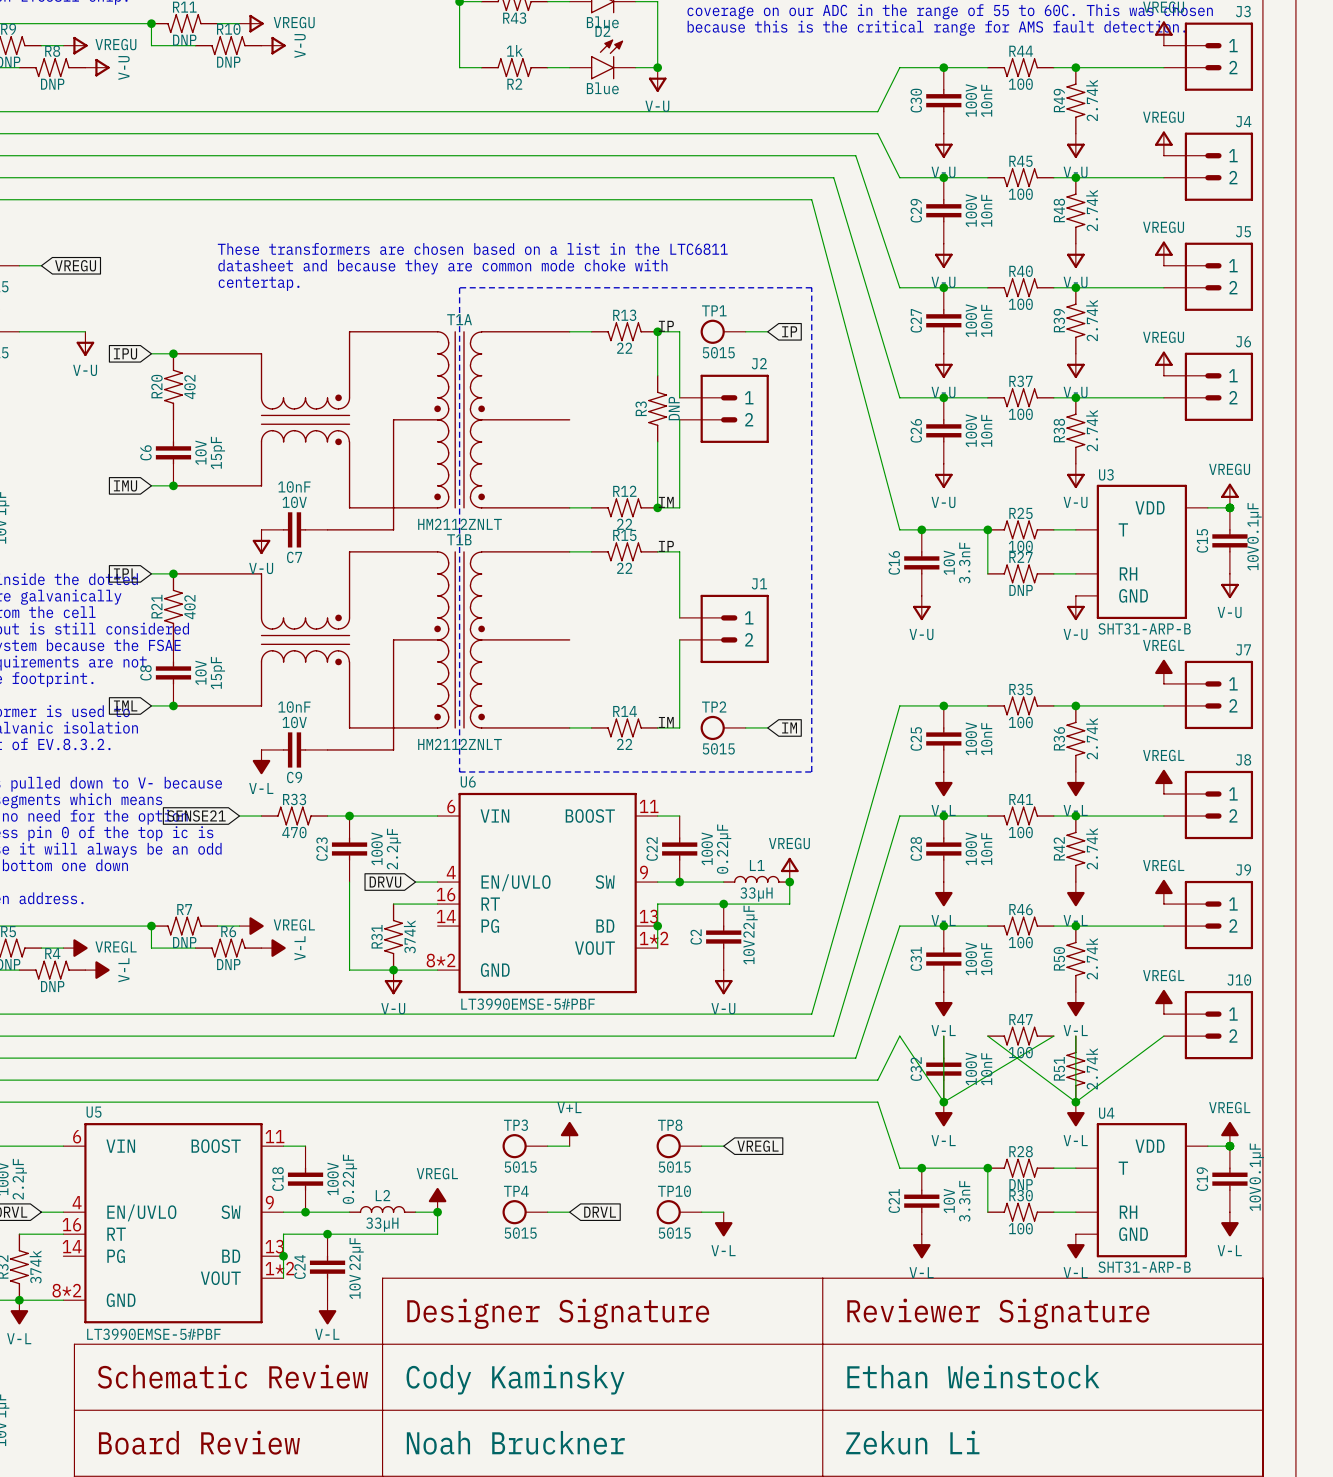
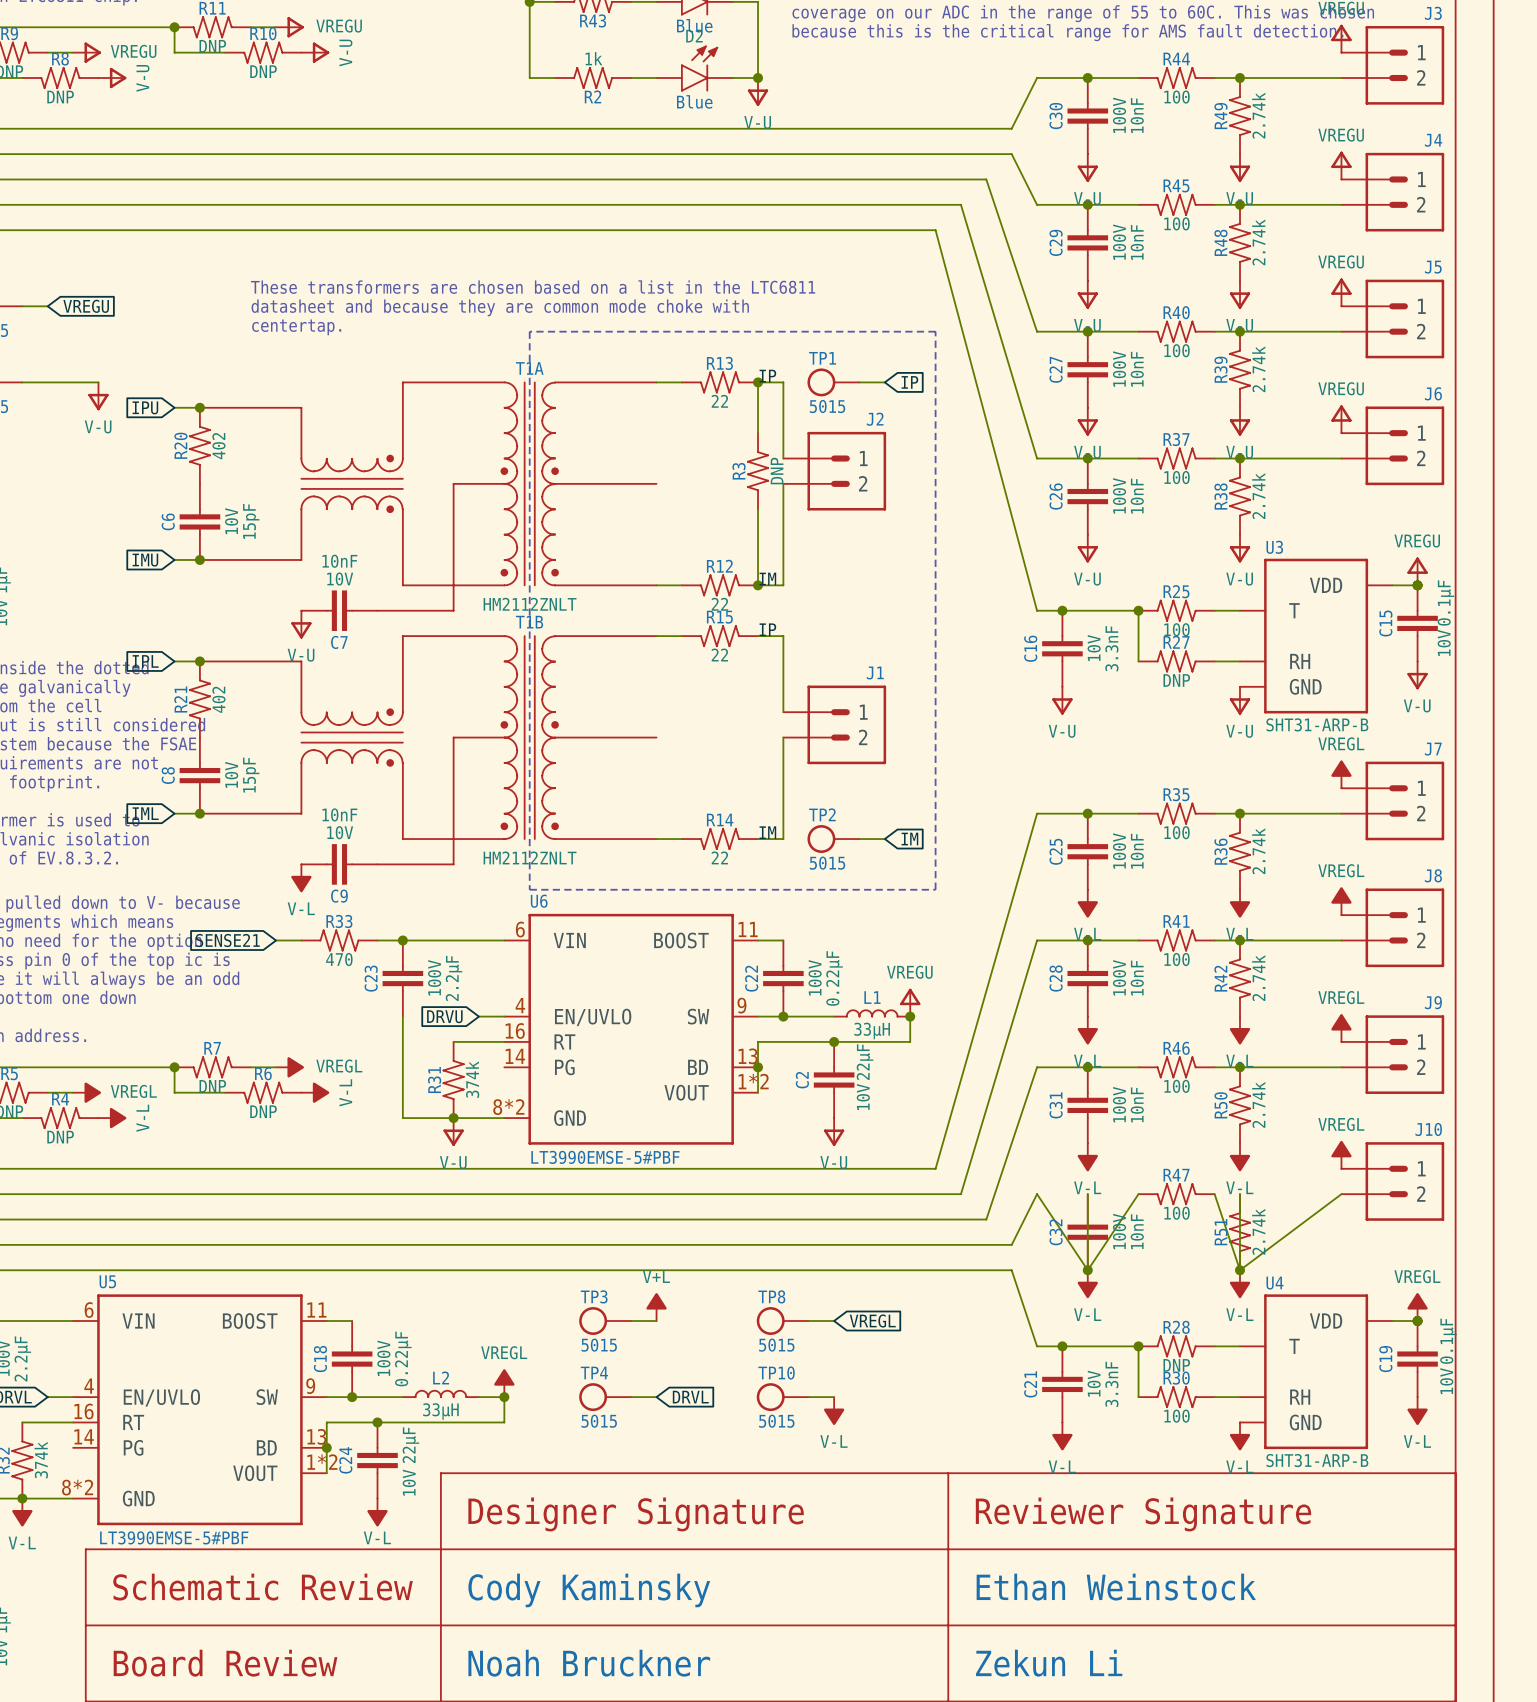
wire: (987, 1036) (1075, 1102) -> (1214, 1194) (1239, 1270)
wire: (1053, 1036) (943, 1102) -> (1138, 1194) (1087, 1270)

